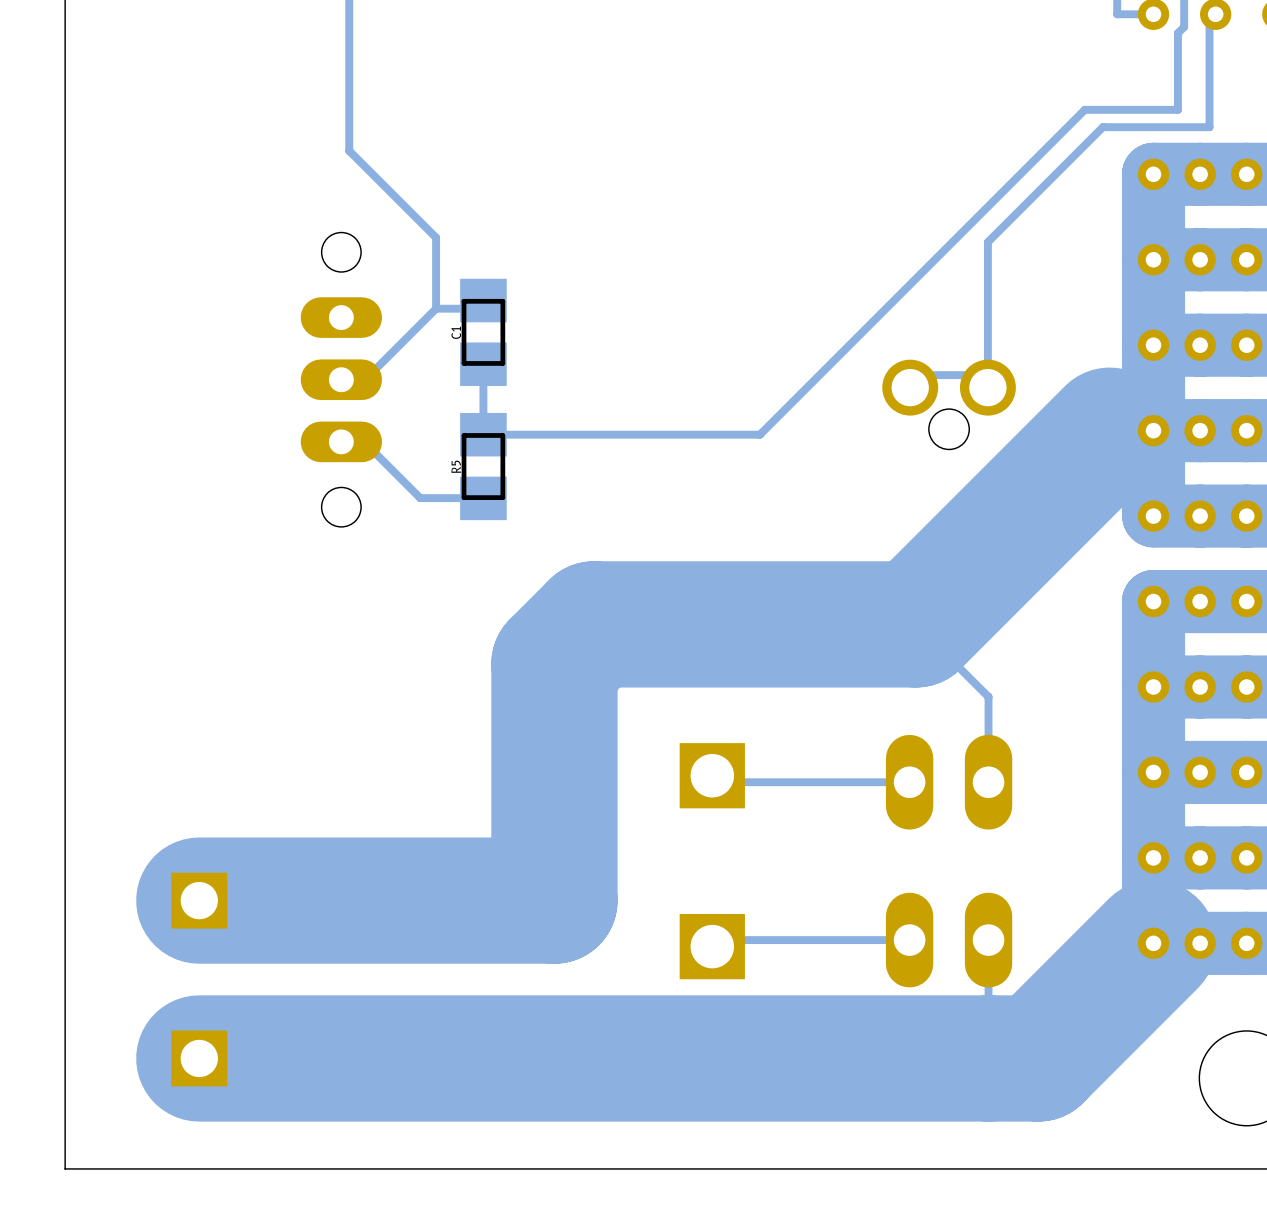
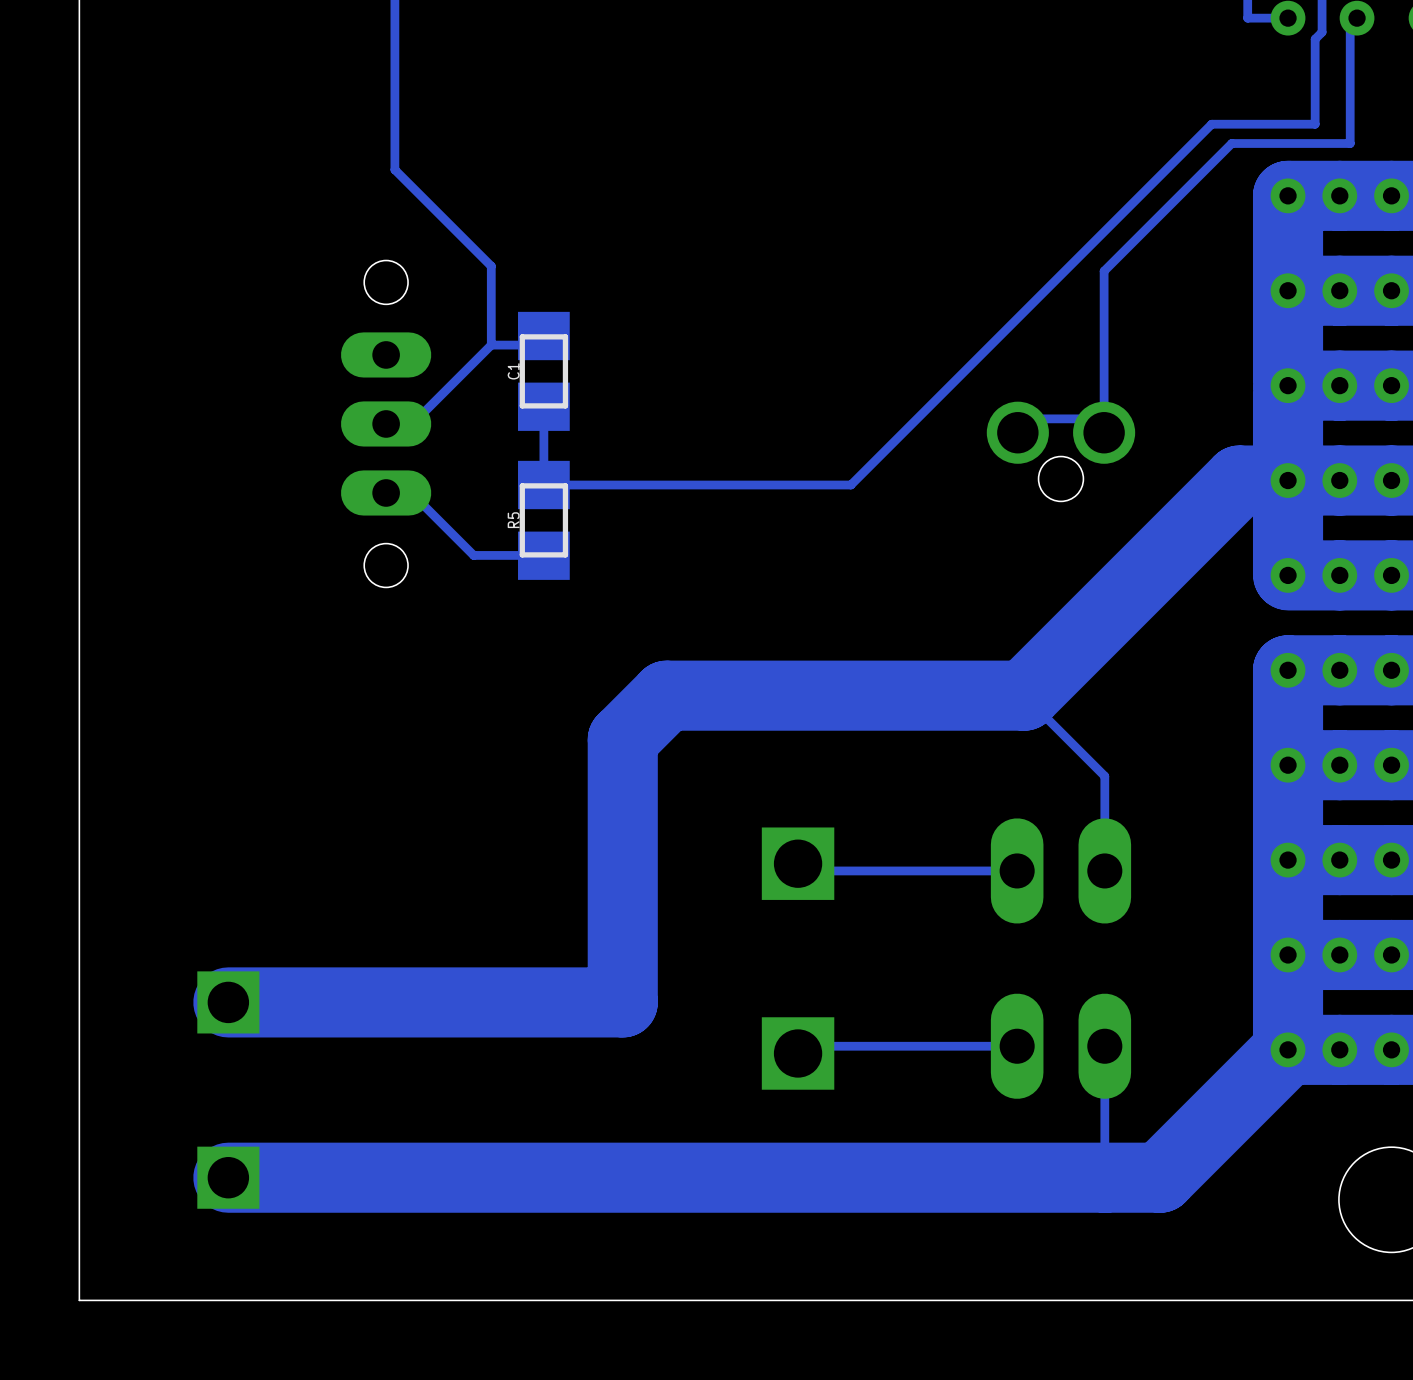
track width: thick (1109, 430) (915, 624) (593, 624) (554, 663) (554, 900) (199, 900) -> thin (1239, 480) (1024, 695) (666, 695) (622, 739) (622, 1002) (228, 1002)
track width: thick (1153, 943) (1038, 1058) (199, 1058) -> thin (1288, 1049) (1160, 1177) (228, 1177)

